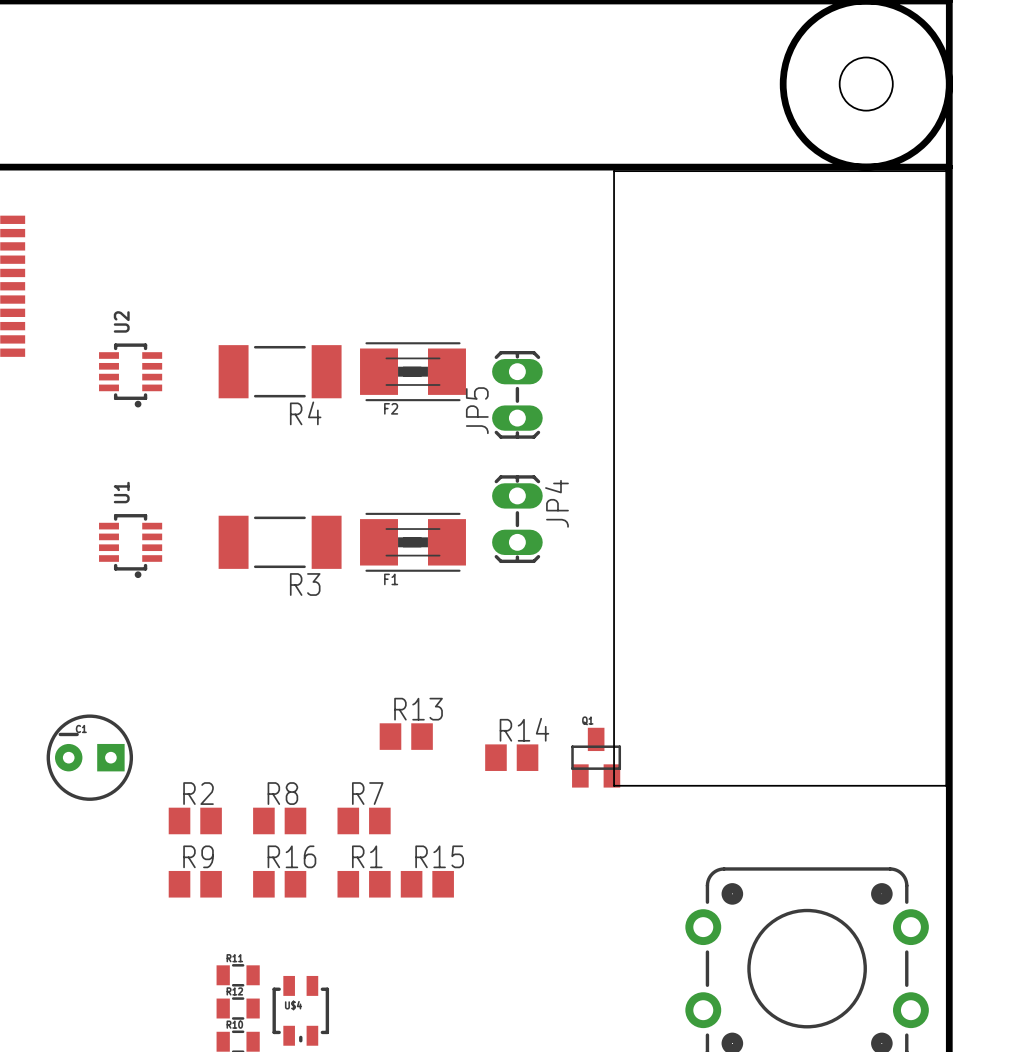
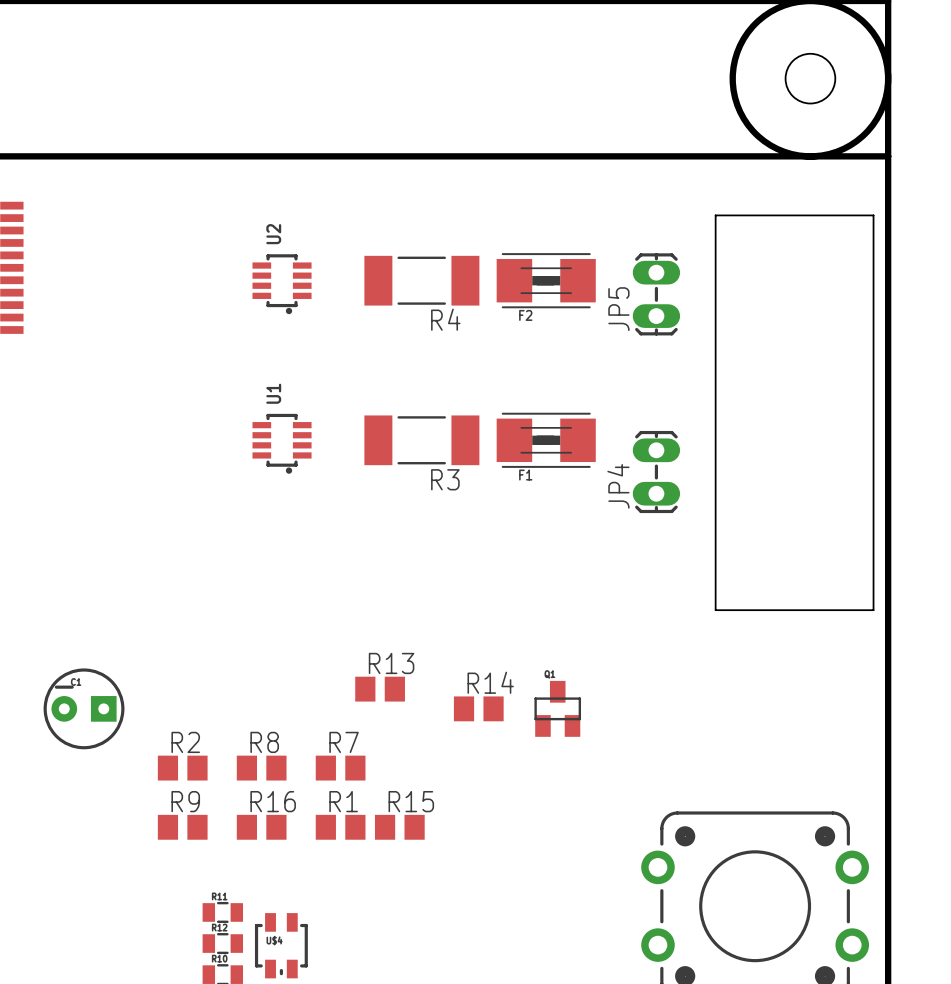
board edge: (614, 171) (946, 171) (946, 785) (614, 785) (614, 171) -> none
board edge: none -> (715, 215) (873, 215) (873, 610) (715, 610) (715, 215)
R4 position: (280, 371) -> (421, 280)
F2 position: (412, 371) -> (546, 280)
U2 position: (130, 375) -> (282, 284)
JP5 position: (517, 394) -> (656, 294)
JP4 name position: JP4 (556, 503) -> JP4 (618, 486)
JP4 position: (517, 519) -> (656, 472)
R3 position: (280, 542) -> (421, 440)
F1 position: (412, 542) -> (546, 440)
U1 position: (130, 546) -> (282, 443)

